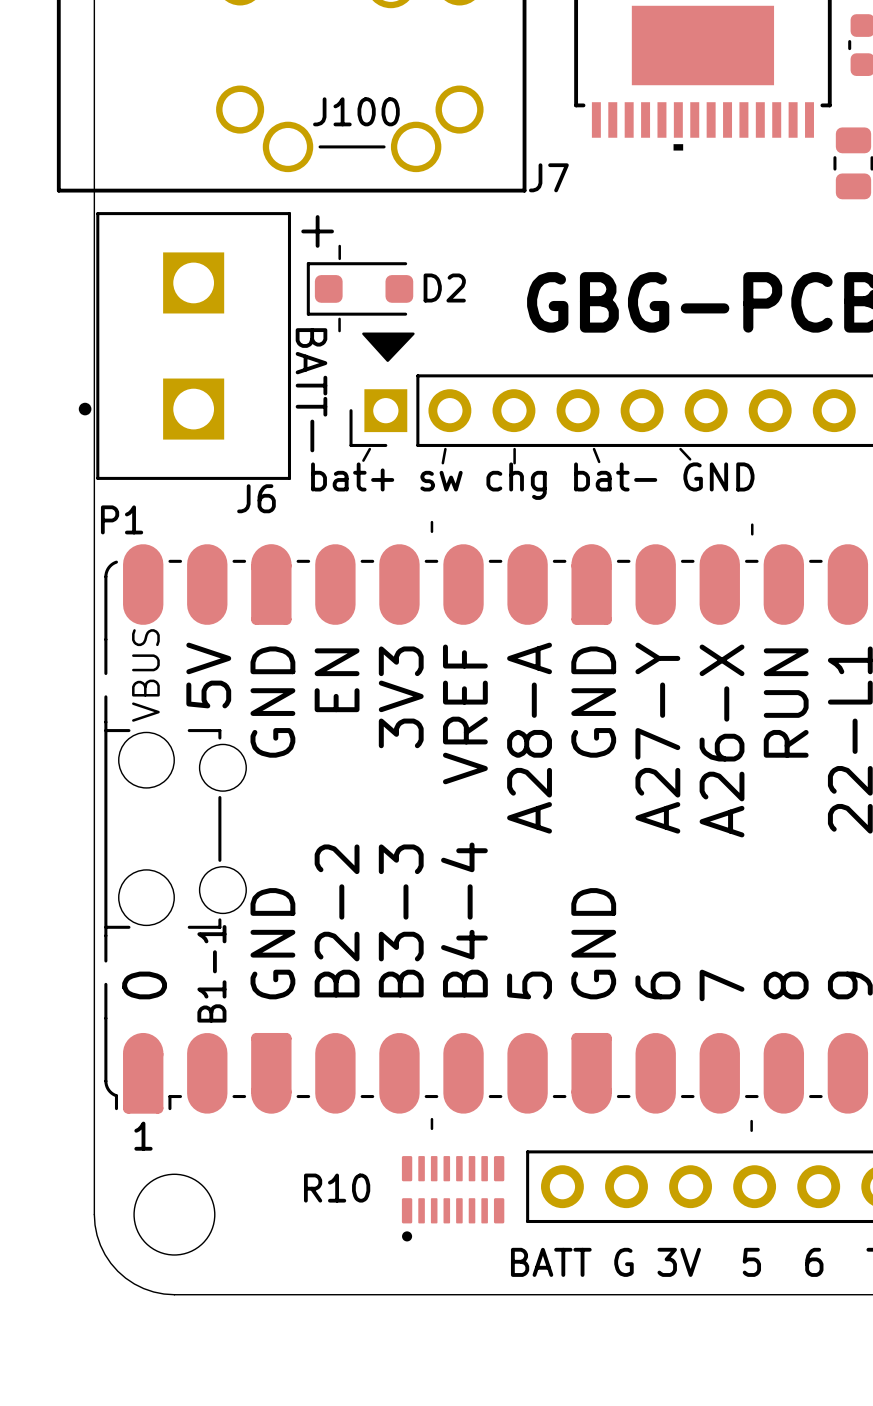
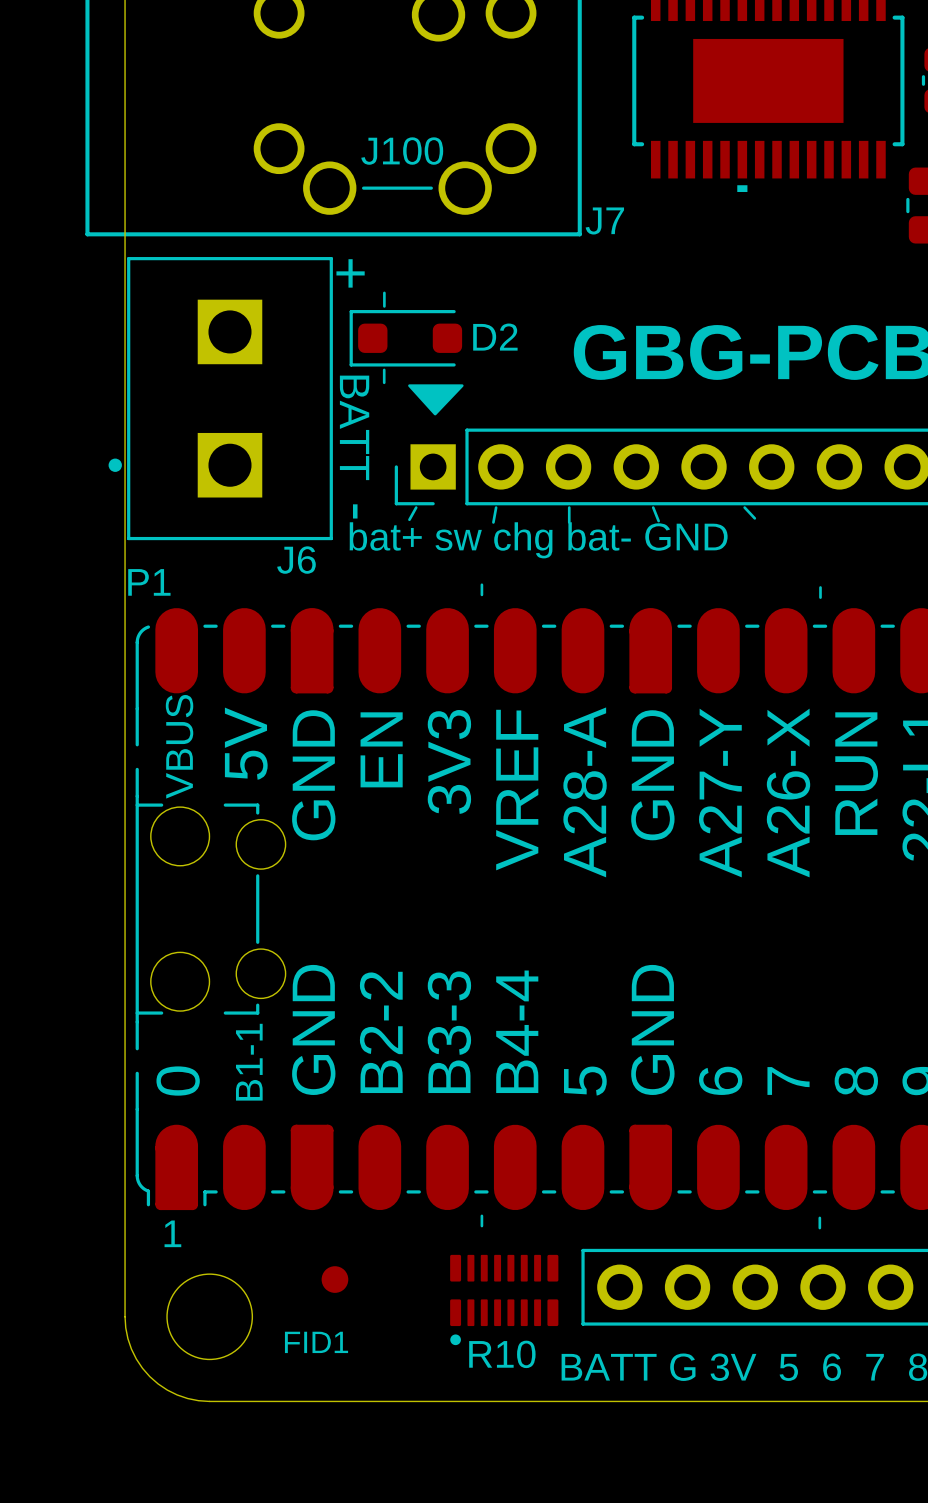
FID1: none -> (334, 1279)
R10 name position: R10 (337, 1188) -> R10 (502, 1354)

